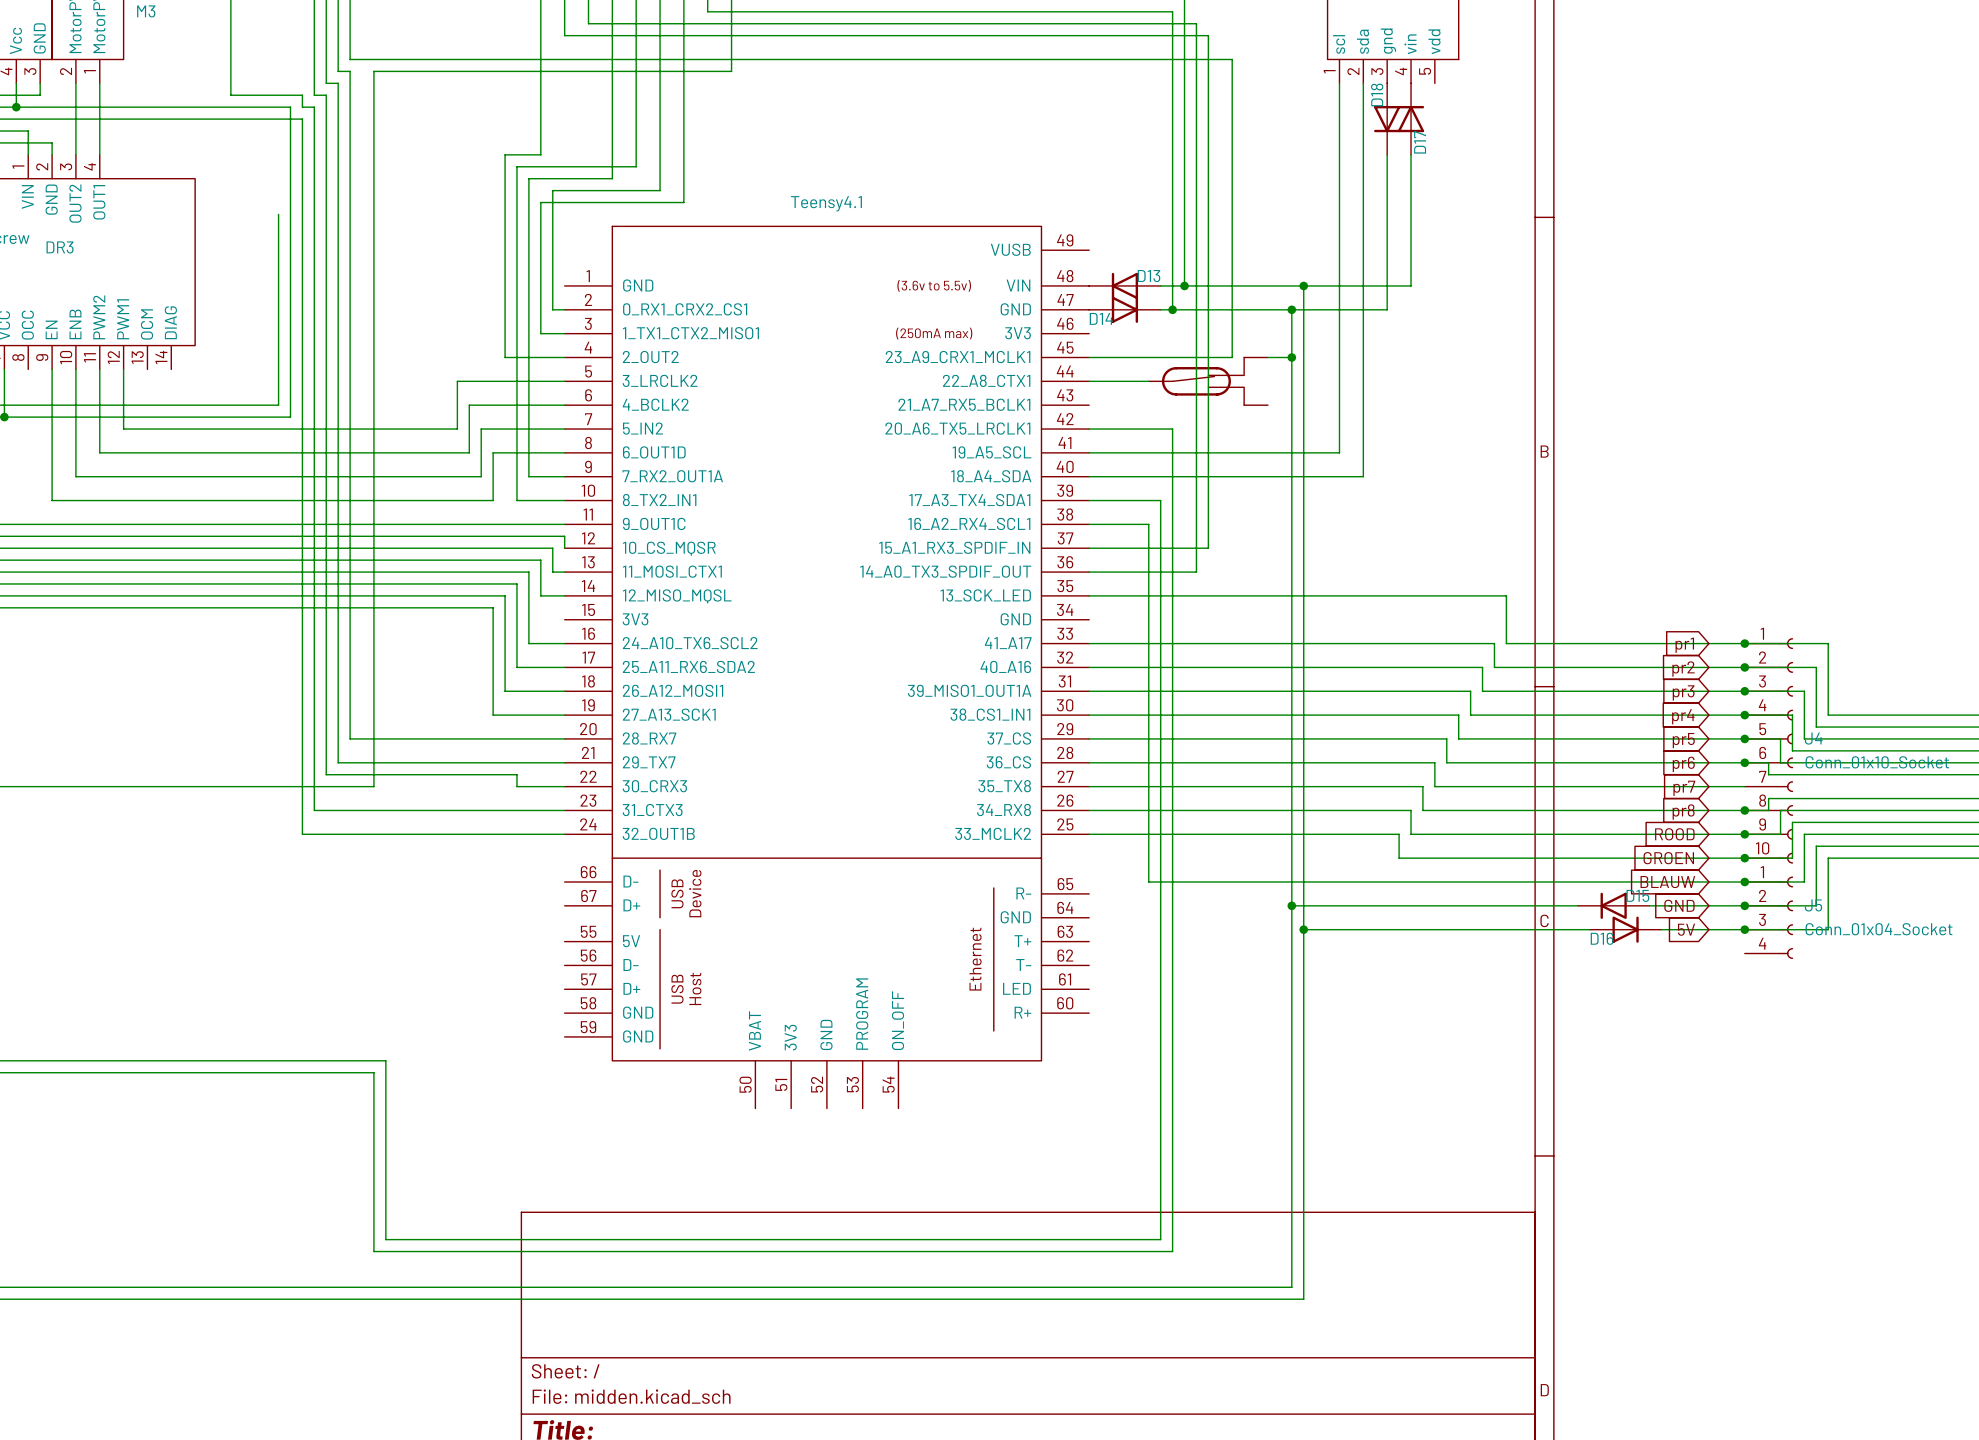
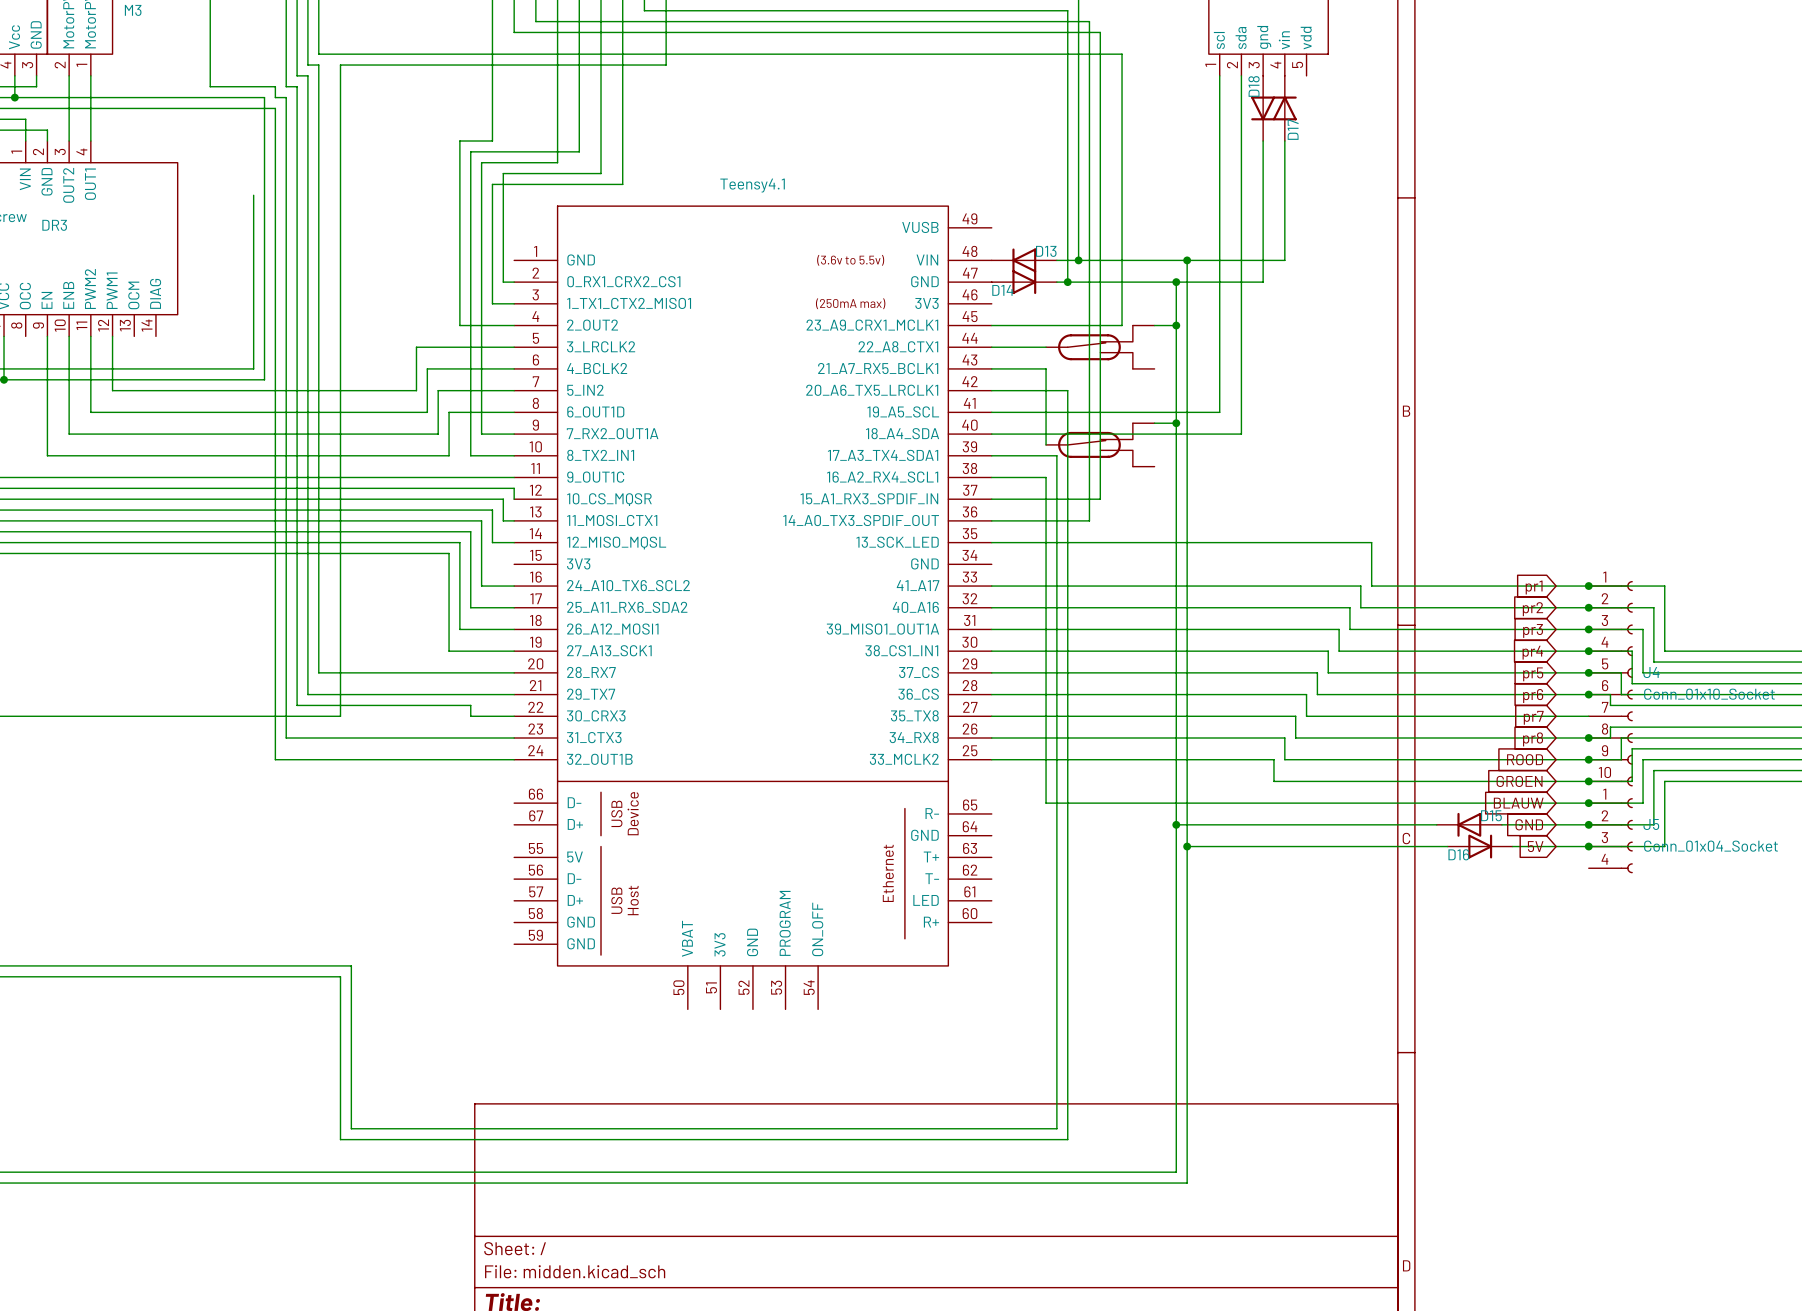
wire: none -> (991, 368) (1046, 368) (1046, 444)
wire: none -> (1154, 423) (1176, 423)
junction: none -> (1176, 423)
part: none -> (1100, 444)

